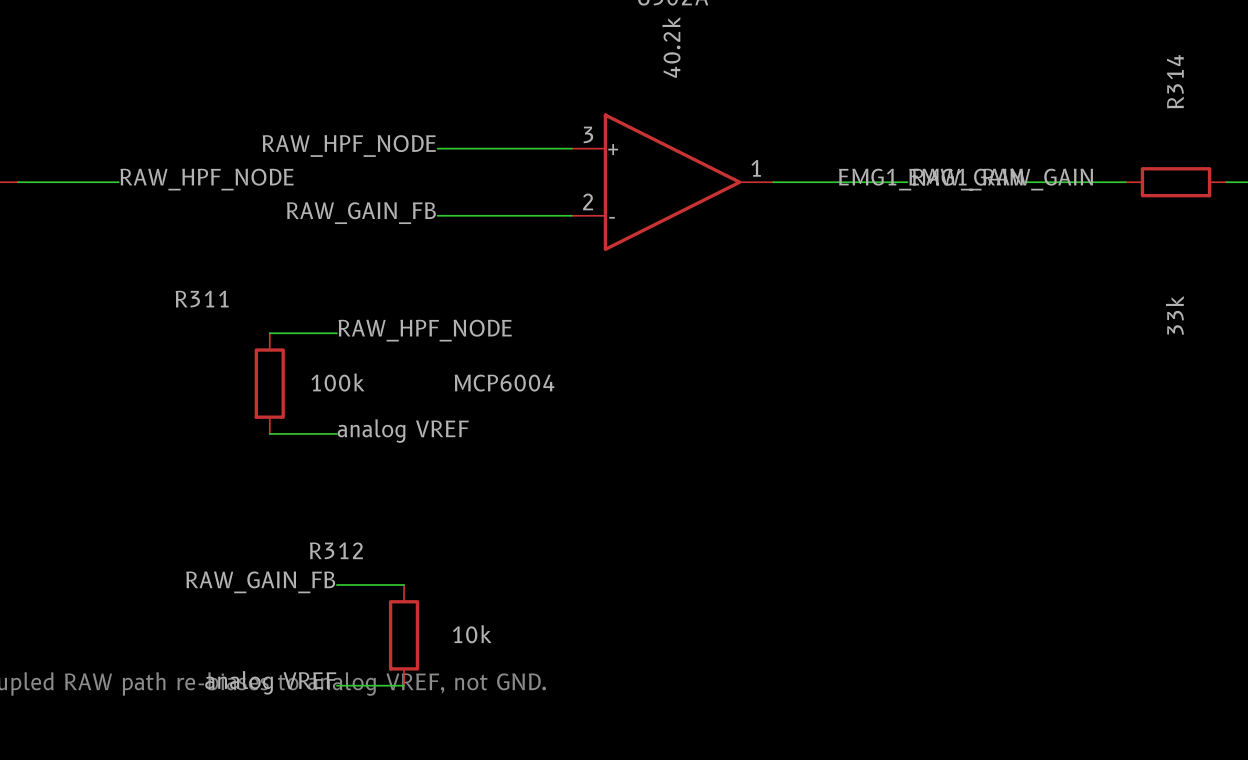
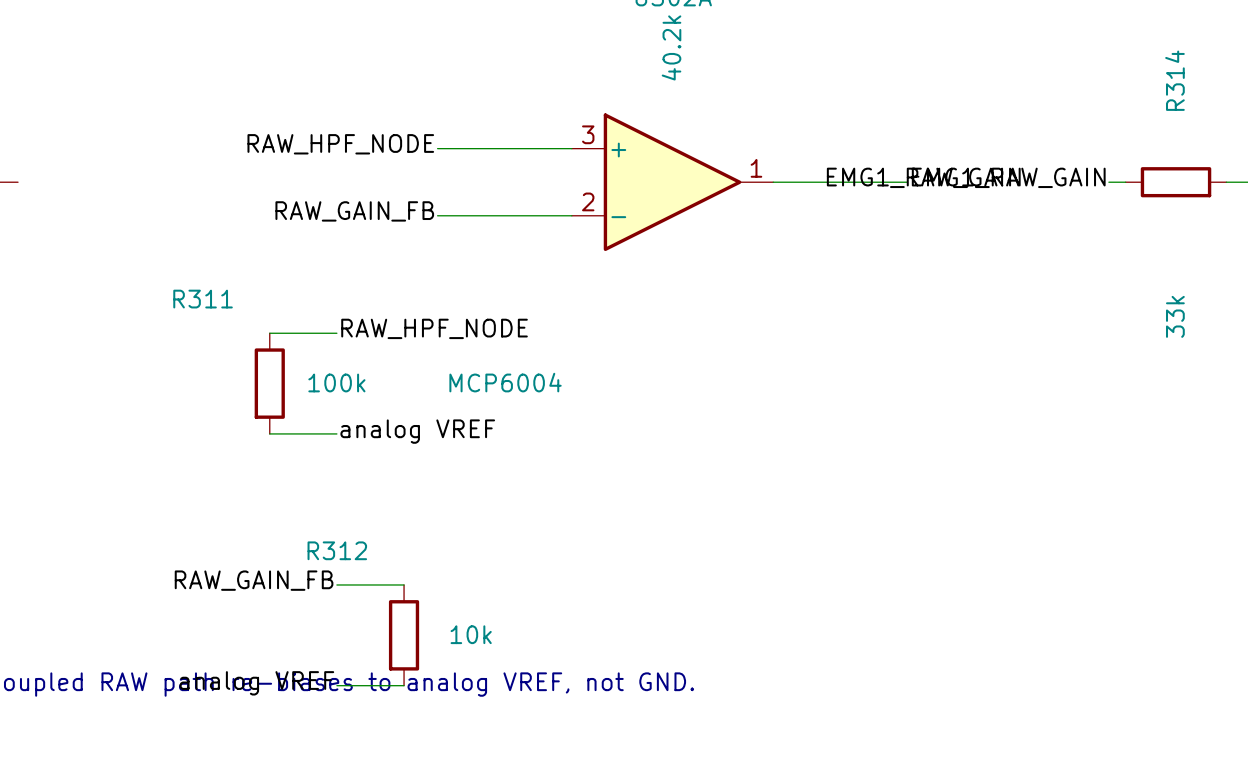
label: RAW_HPF_NODE (207, 179) -> none
wire: (18, 182) (118, 182) -> none
wire: (1024, 182) (1108, 182) -> none

